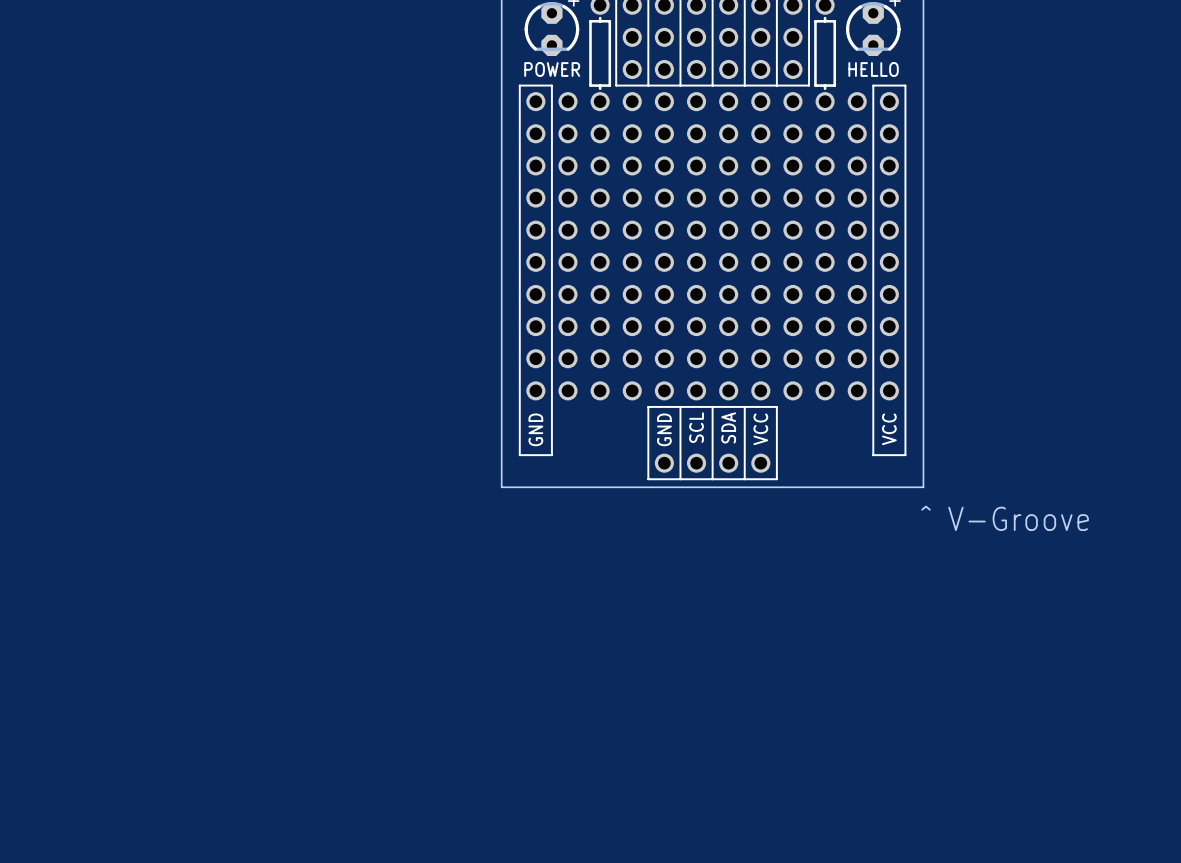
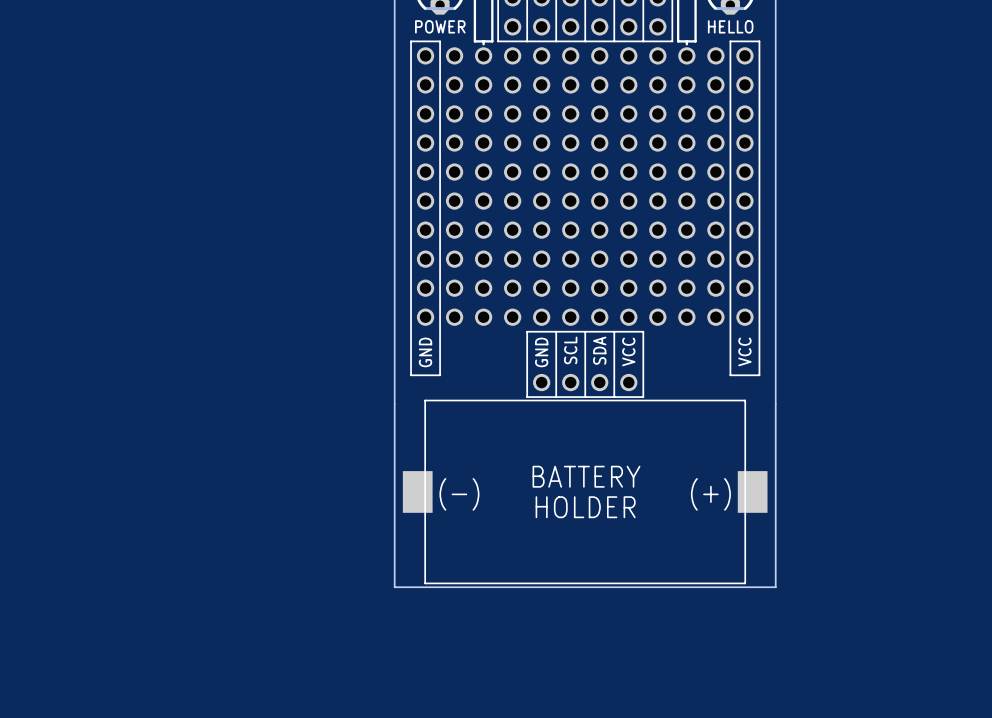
board edge: (501, 487) (923, 487) -> (394, 404) (394, 587) (775, 587) (775, 404)
text: ^ V-Groove (1005, 518) -> none
part: none -> (585, 491)

